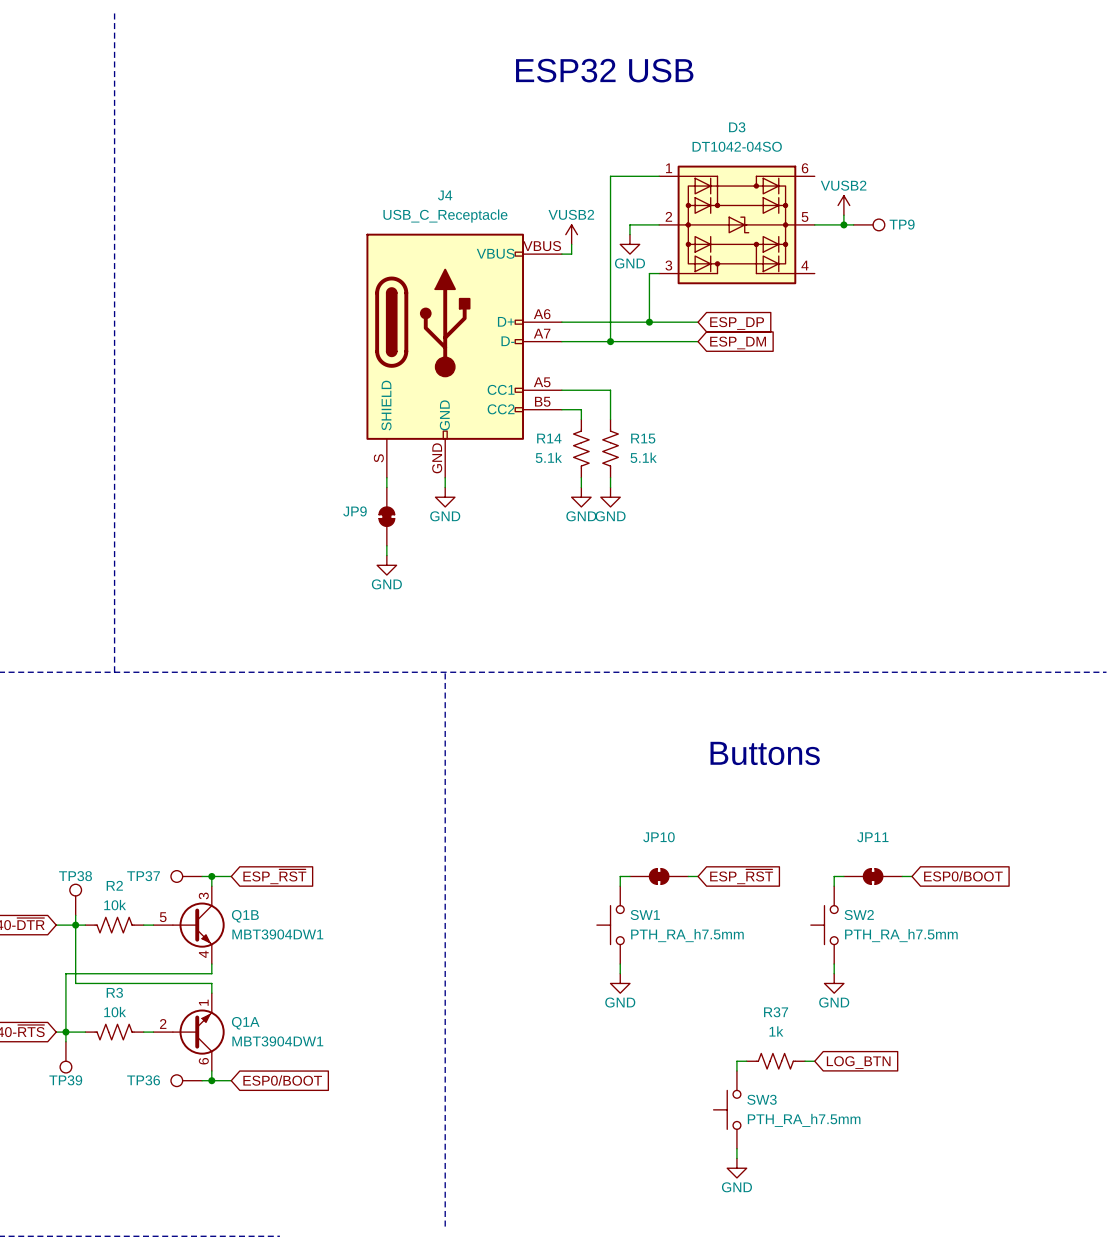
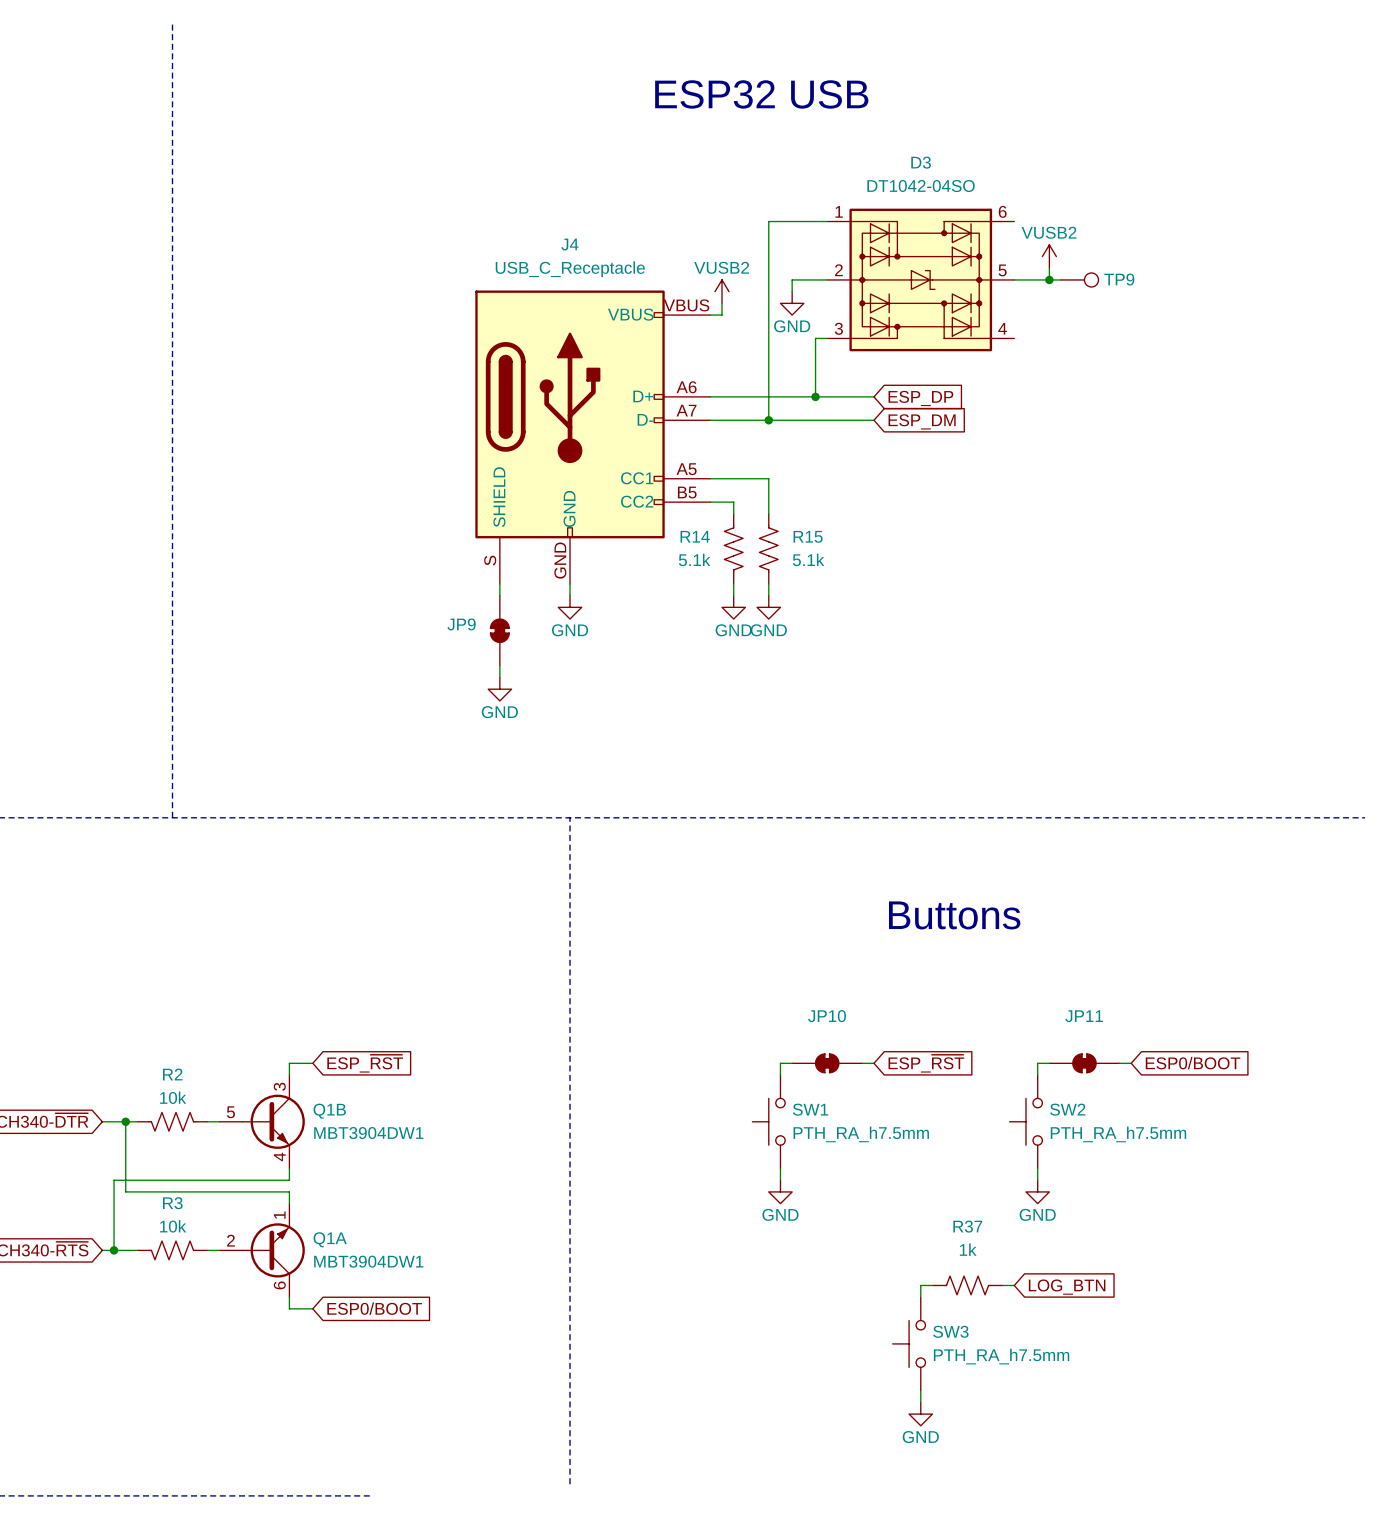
TP37: (186, 876) -> none
wire: (202, 876) (211, 876) -> none
junction: (211, 876) -> none
TP38: (75, 899) -> none
wire: (75, 915) (75, 925) -> none
wire: (65, 1032) (65, 1041) -> none
TP39: (65, 1057) -> none
TP36: (186, 1080) -> none
wire: (202, 1080) (211, 1080) -> none
junction: (211, 1080) -> none

